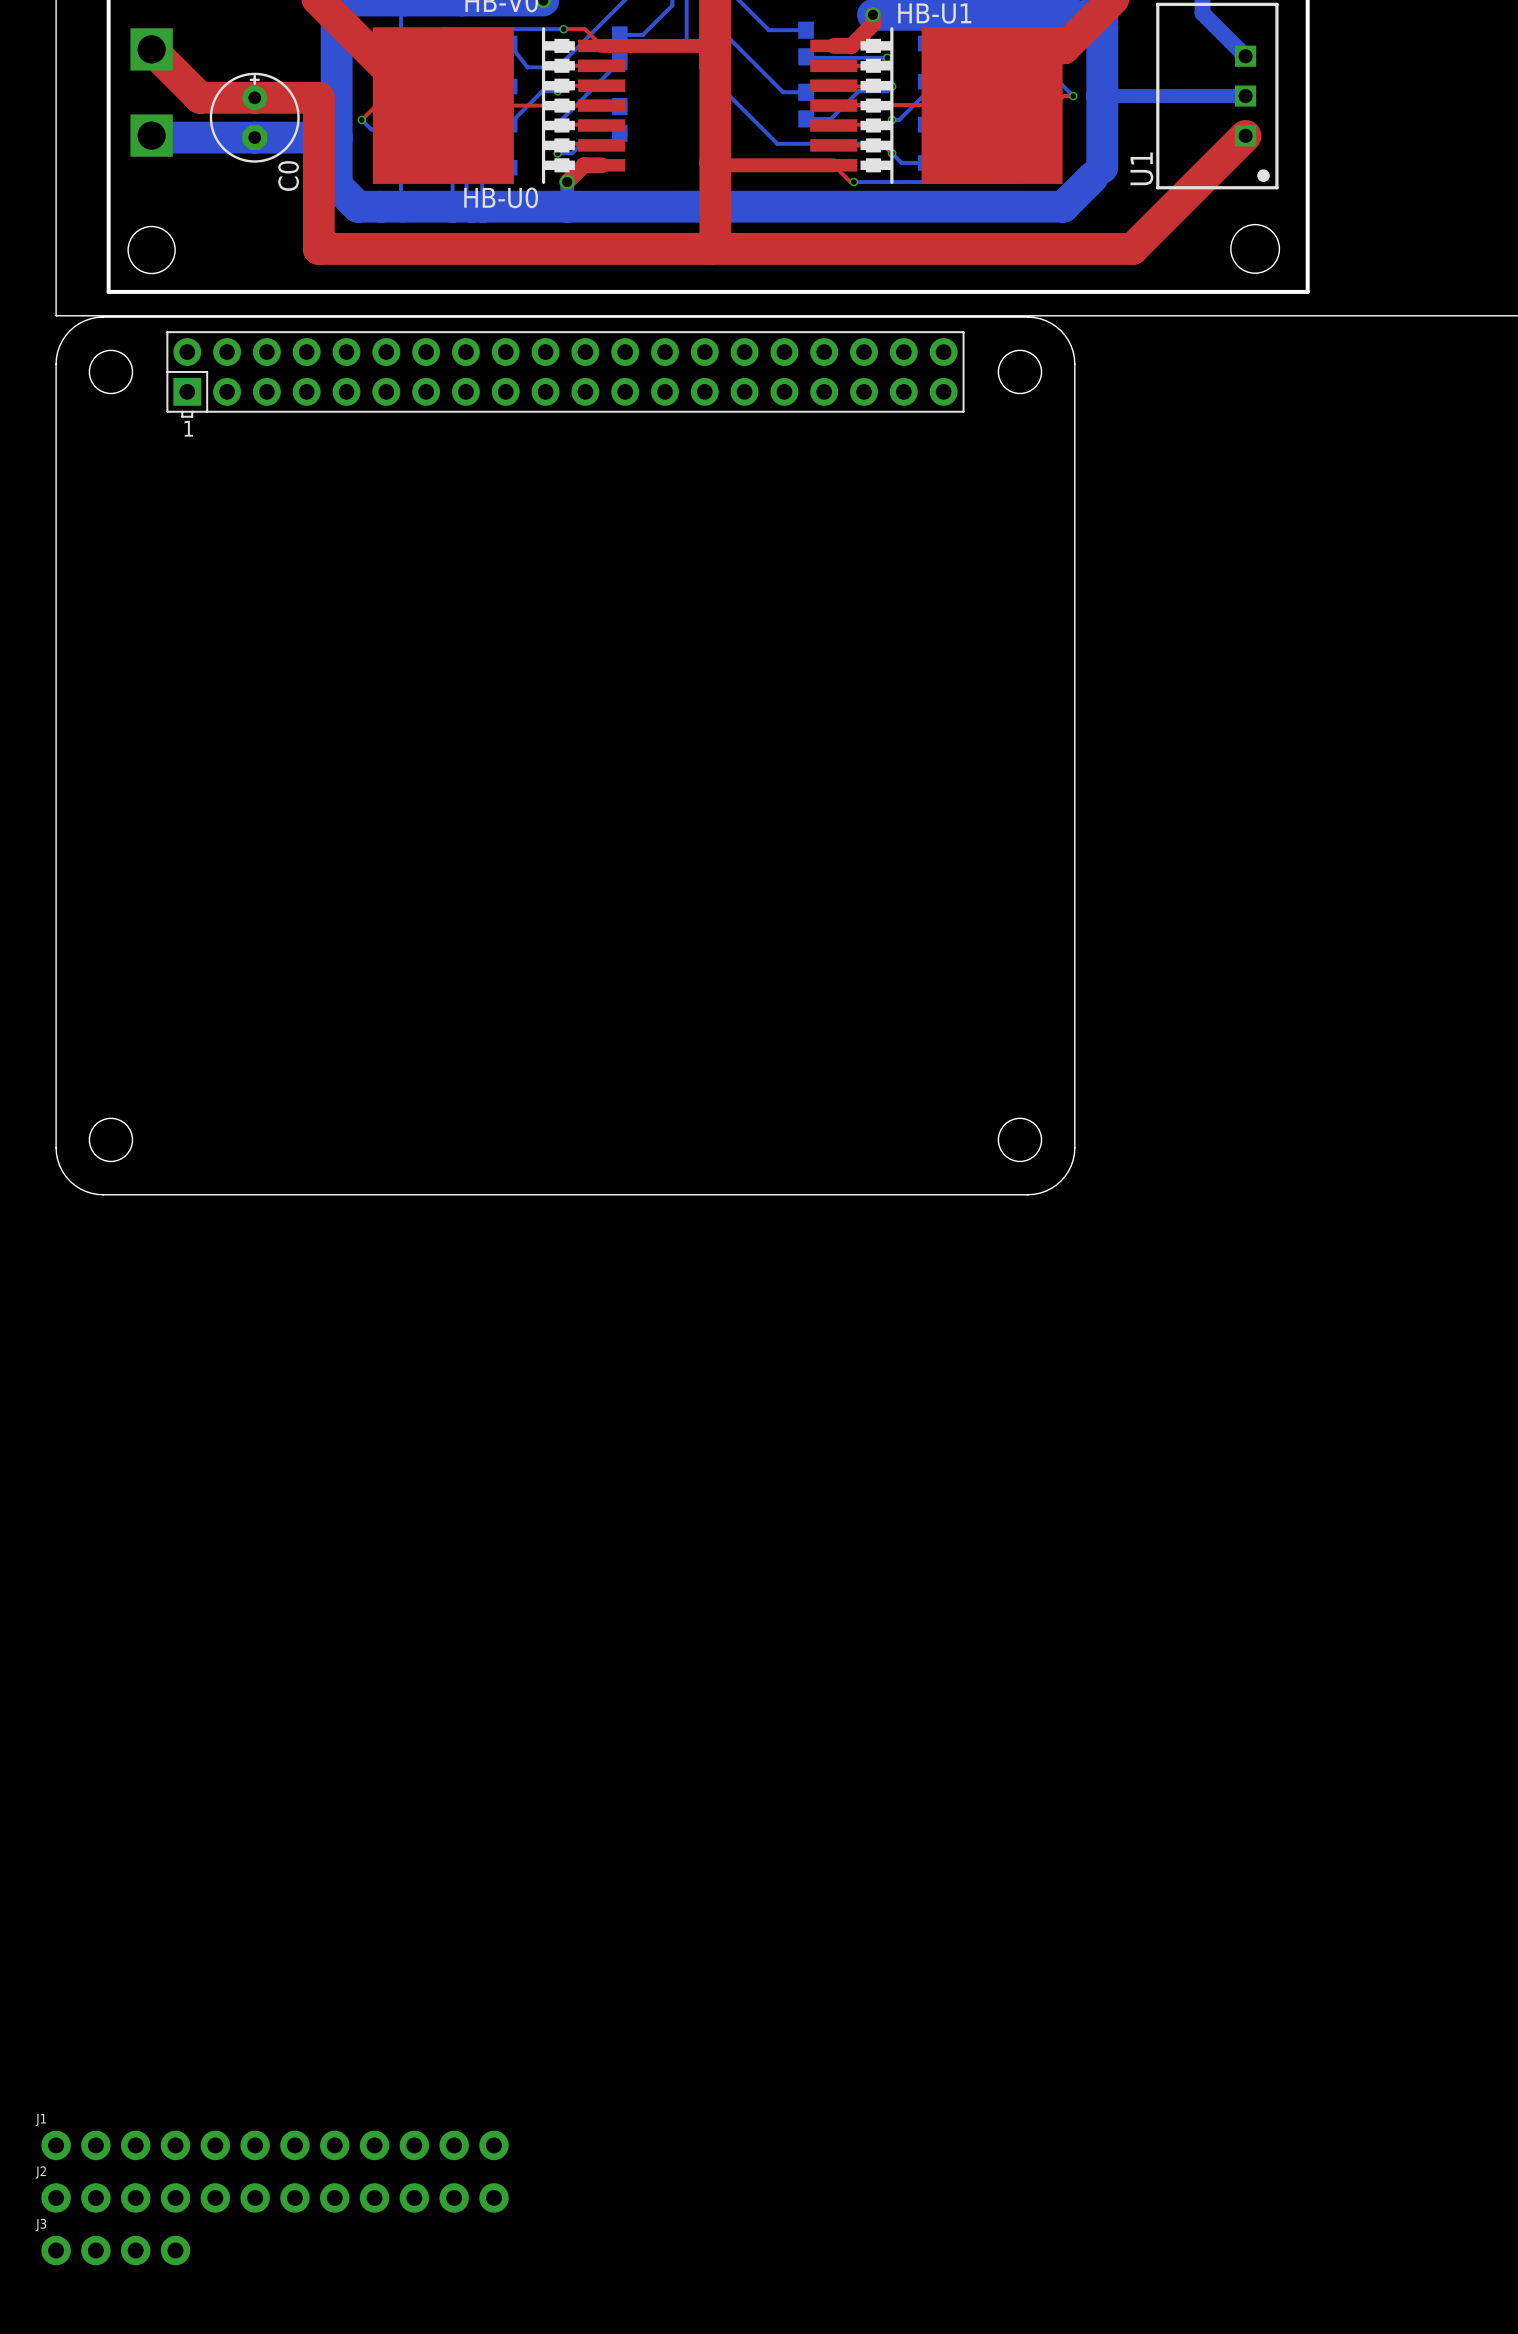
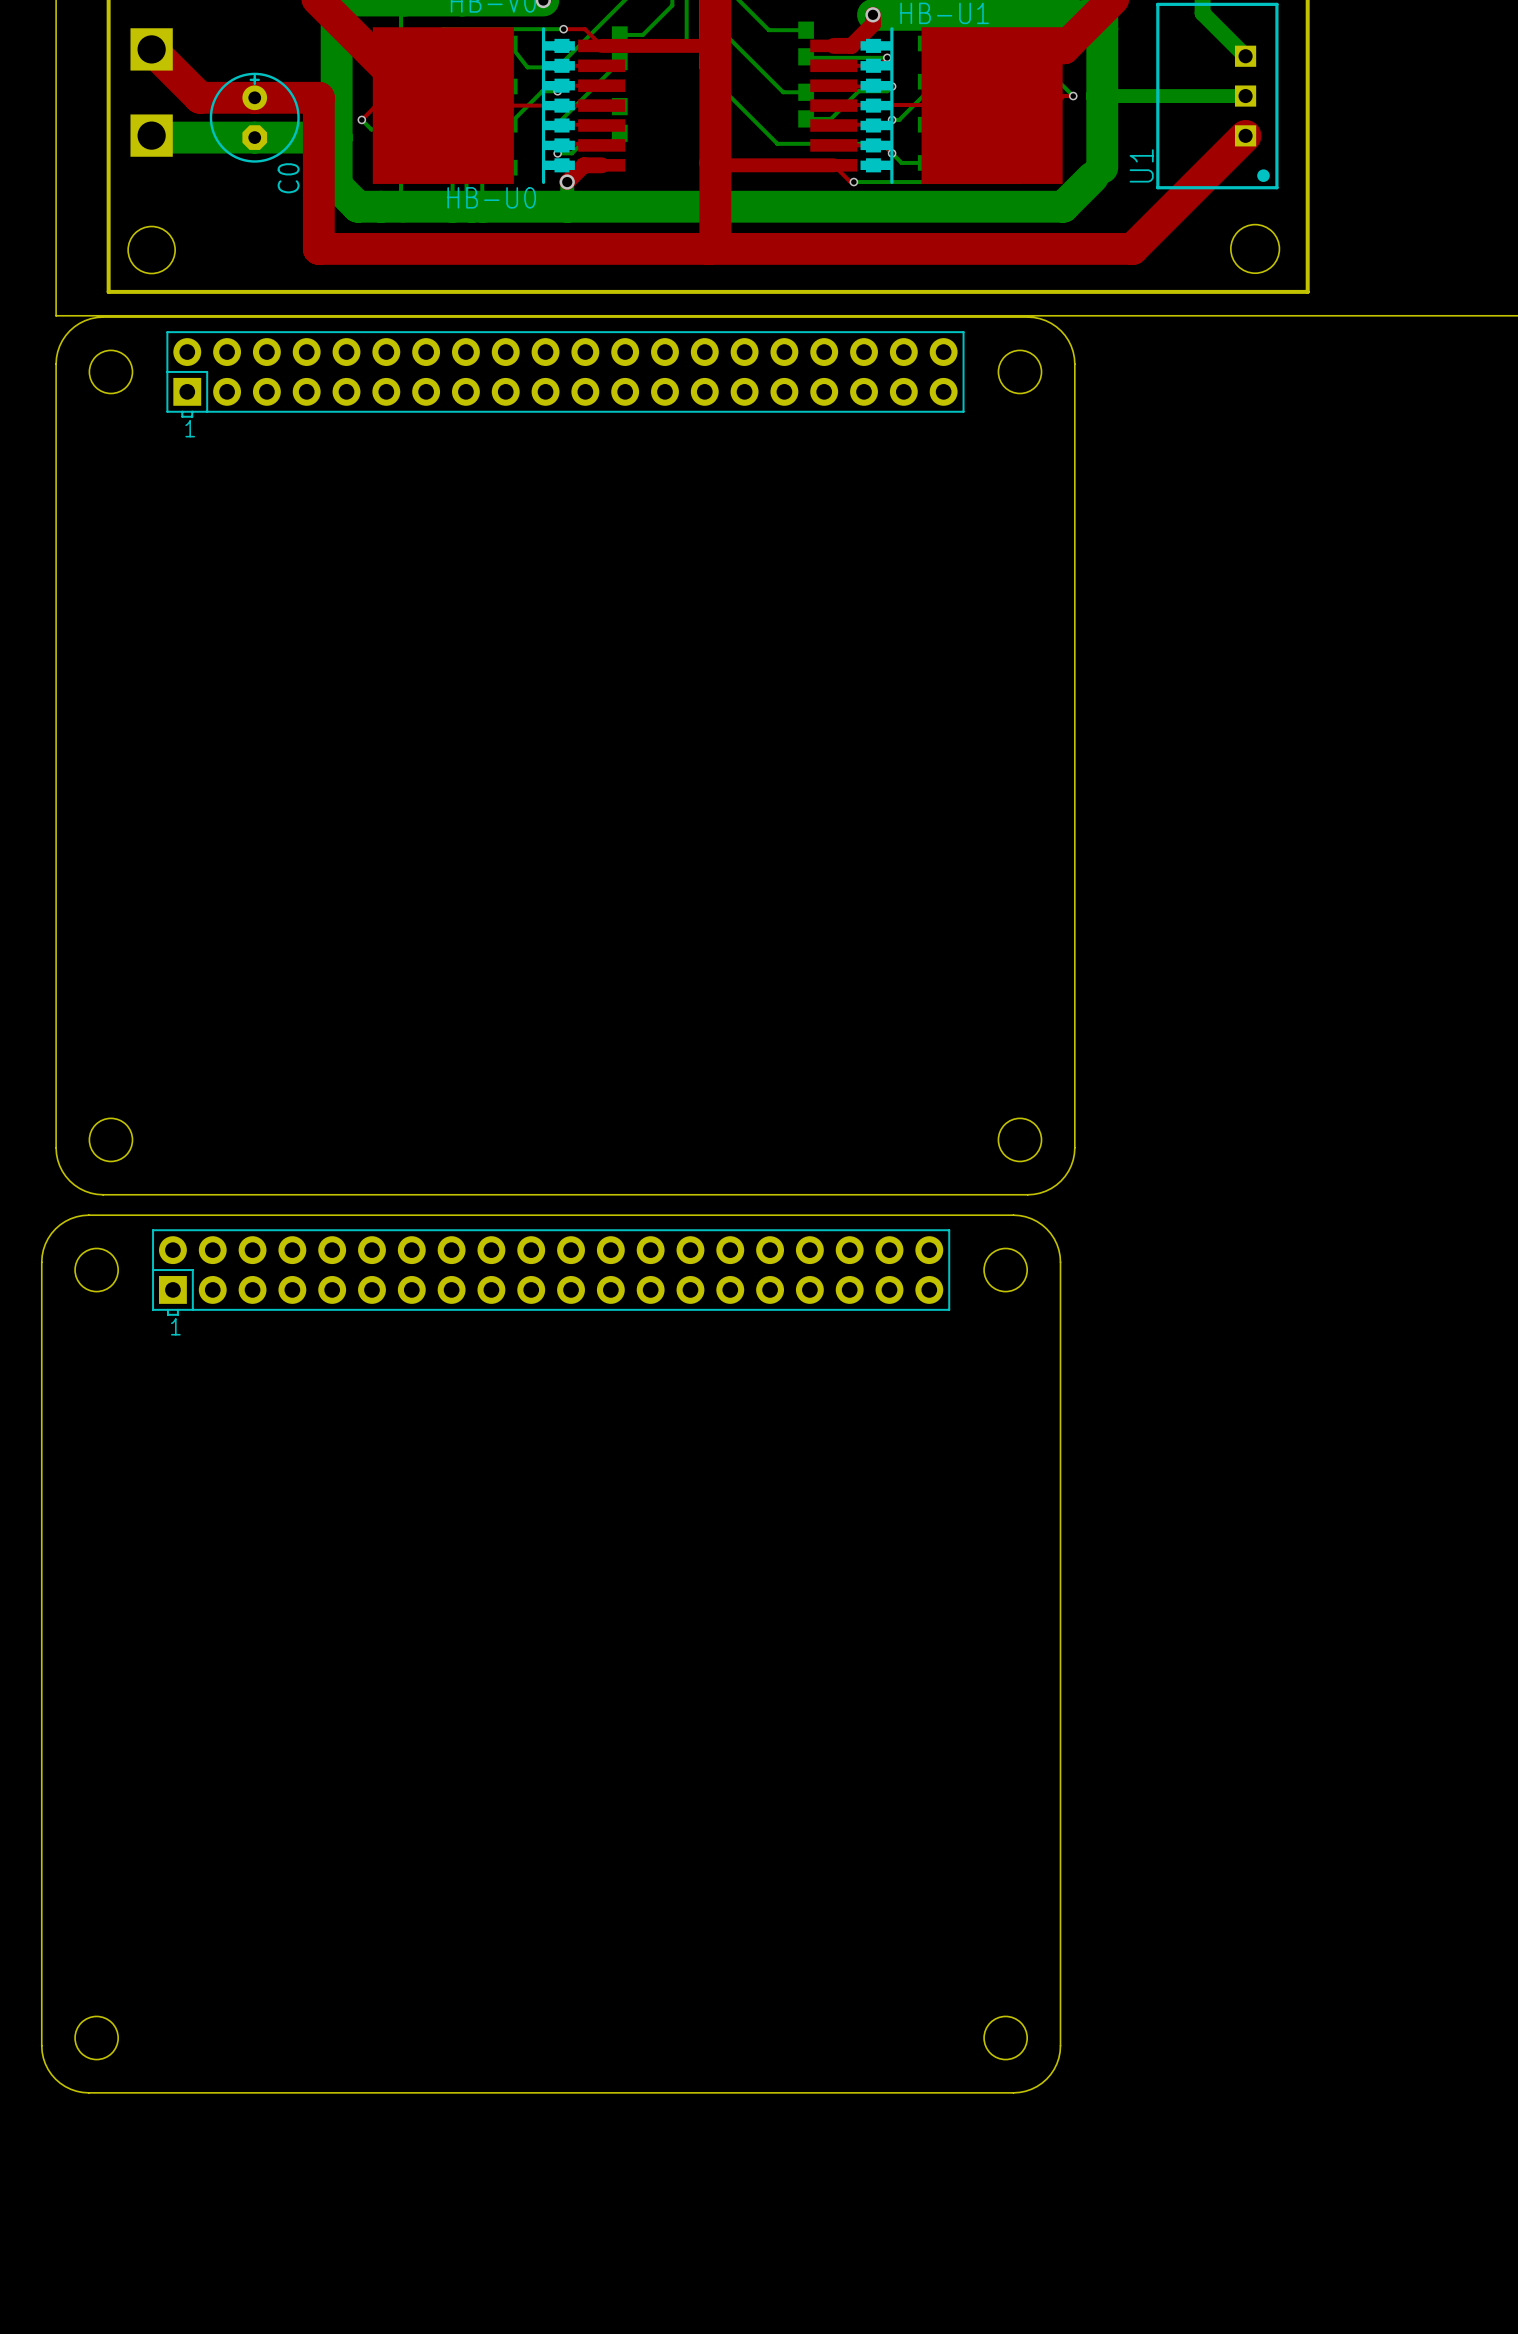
part: none -> (551, 1654)
J1: (275, 2145) -> none
J2: (275, 2197) -> none
J3: (115, 2250) -> none

